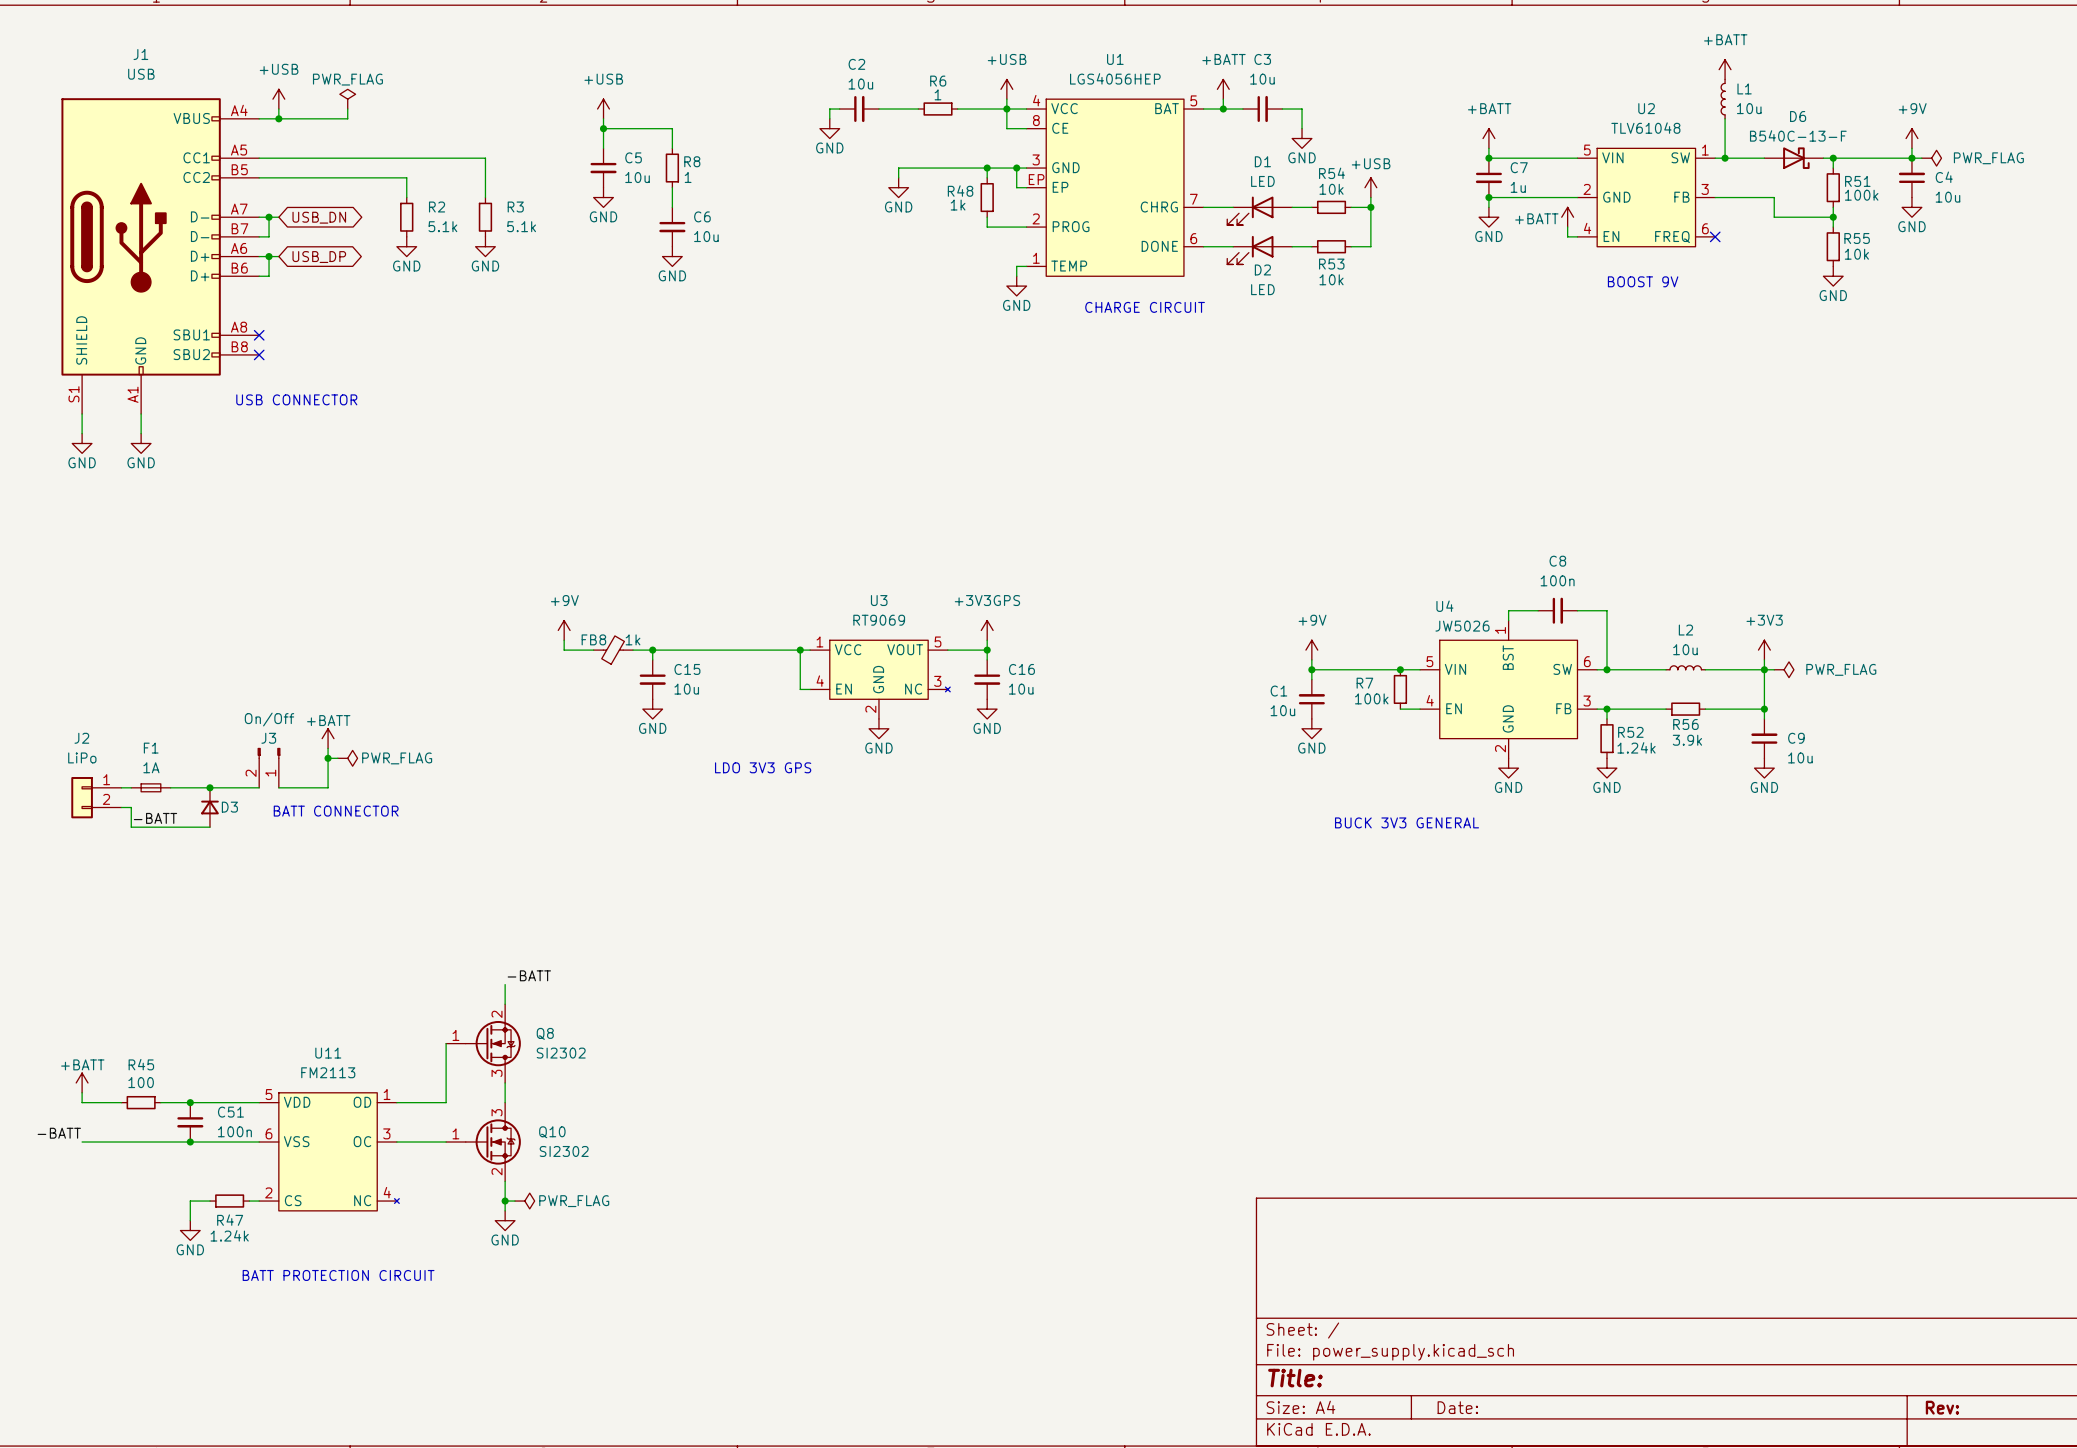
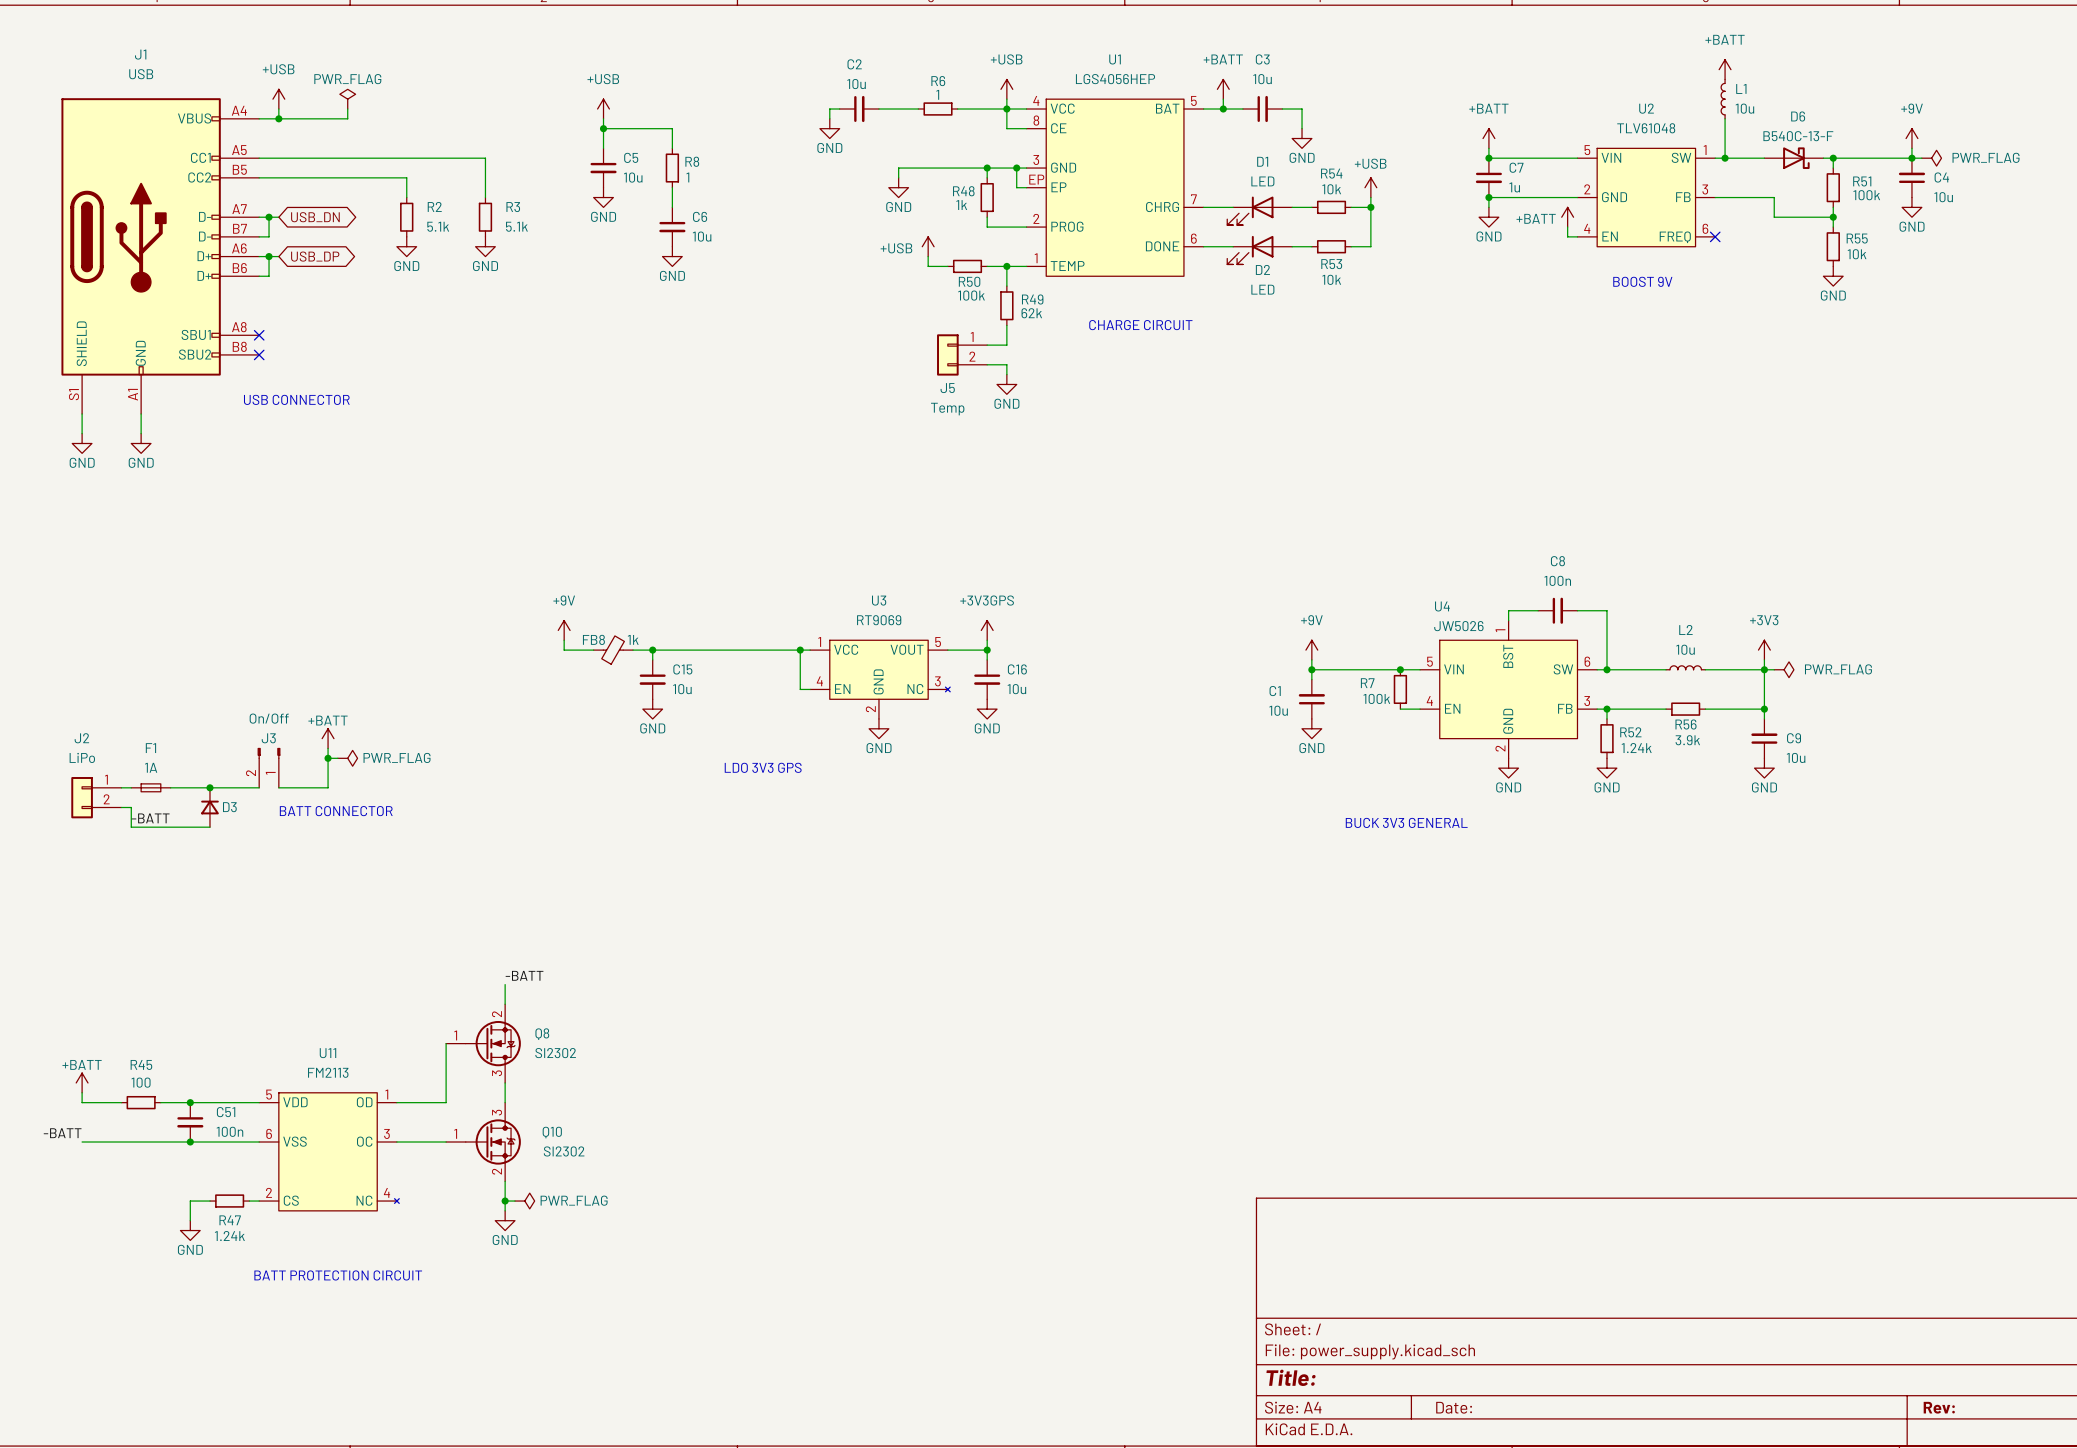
power symbol: none -> +USB (928, 246)
wire: none -> (928, 256) (928, 266) (947, 266)
R50: none -> 100k (967, 266)
wire: none -> (1006, 266) (1006, 286)
junction: none -> (1006, 266)
wire: (1016, 266) (1016, 276) -> (1016, 266) (987, 266)
power symbol position: GND (1016, 286) -> GND (1006, 384)
R49: none -> 62k (1006, 305)
text position: CHARGE CIRCUIT (1145, 307) -> CHARGE CIRCUIT (1140, 325)
wire: none -> (1006, 325) (1006, 345) (987, 345)
J5: none -> Temp (962, 354)
wire: none -> (987, 364) (1006, 364) (1006, 374)

